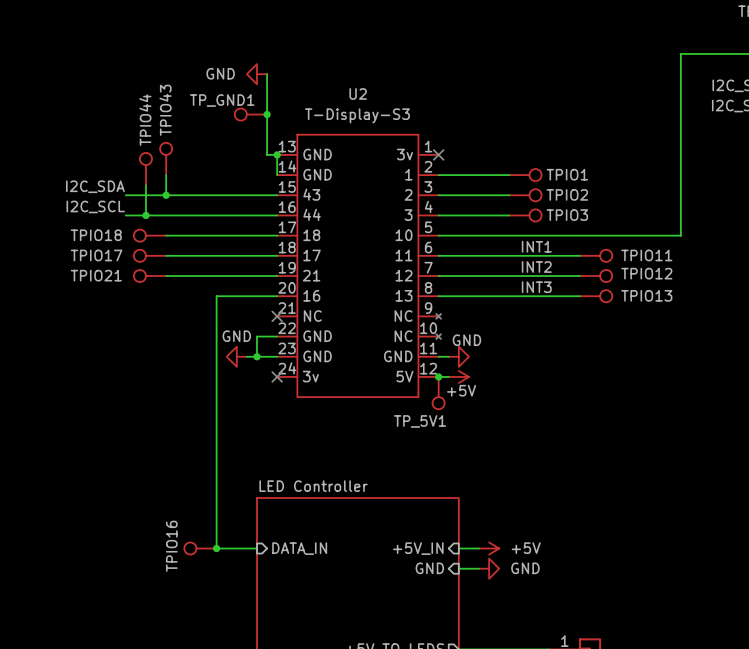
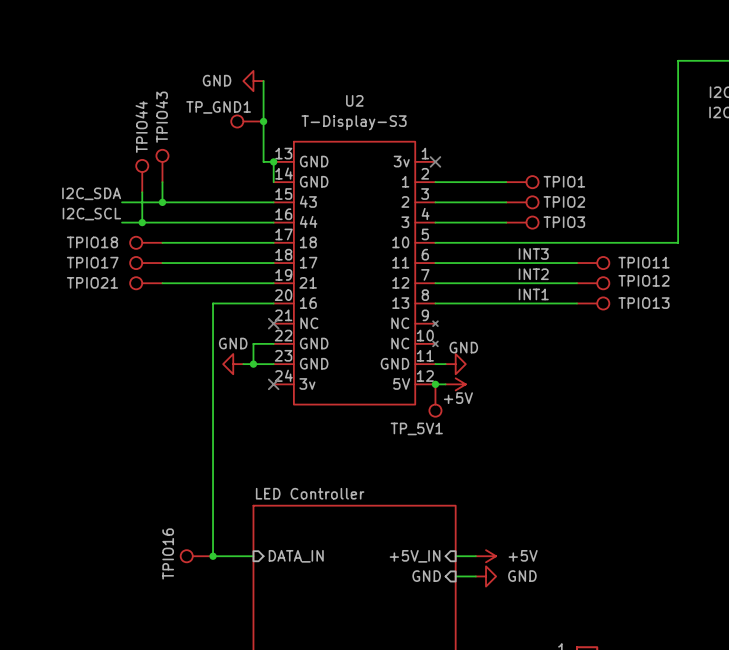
label: INT1 (536, 246) -> INT3 (533, 254)
label: INT3 (536, 287) -> INT1 (533, 294)

